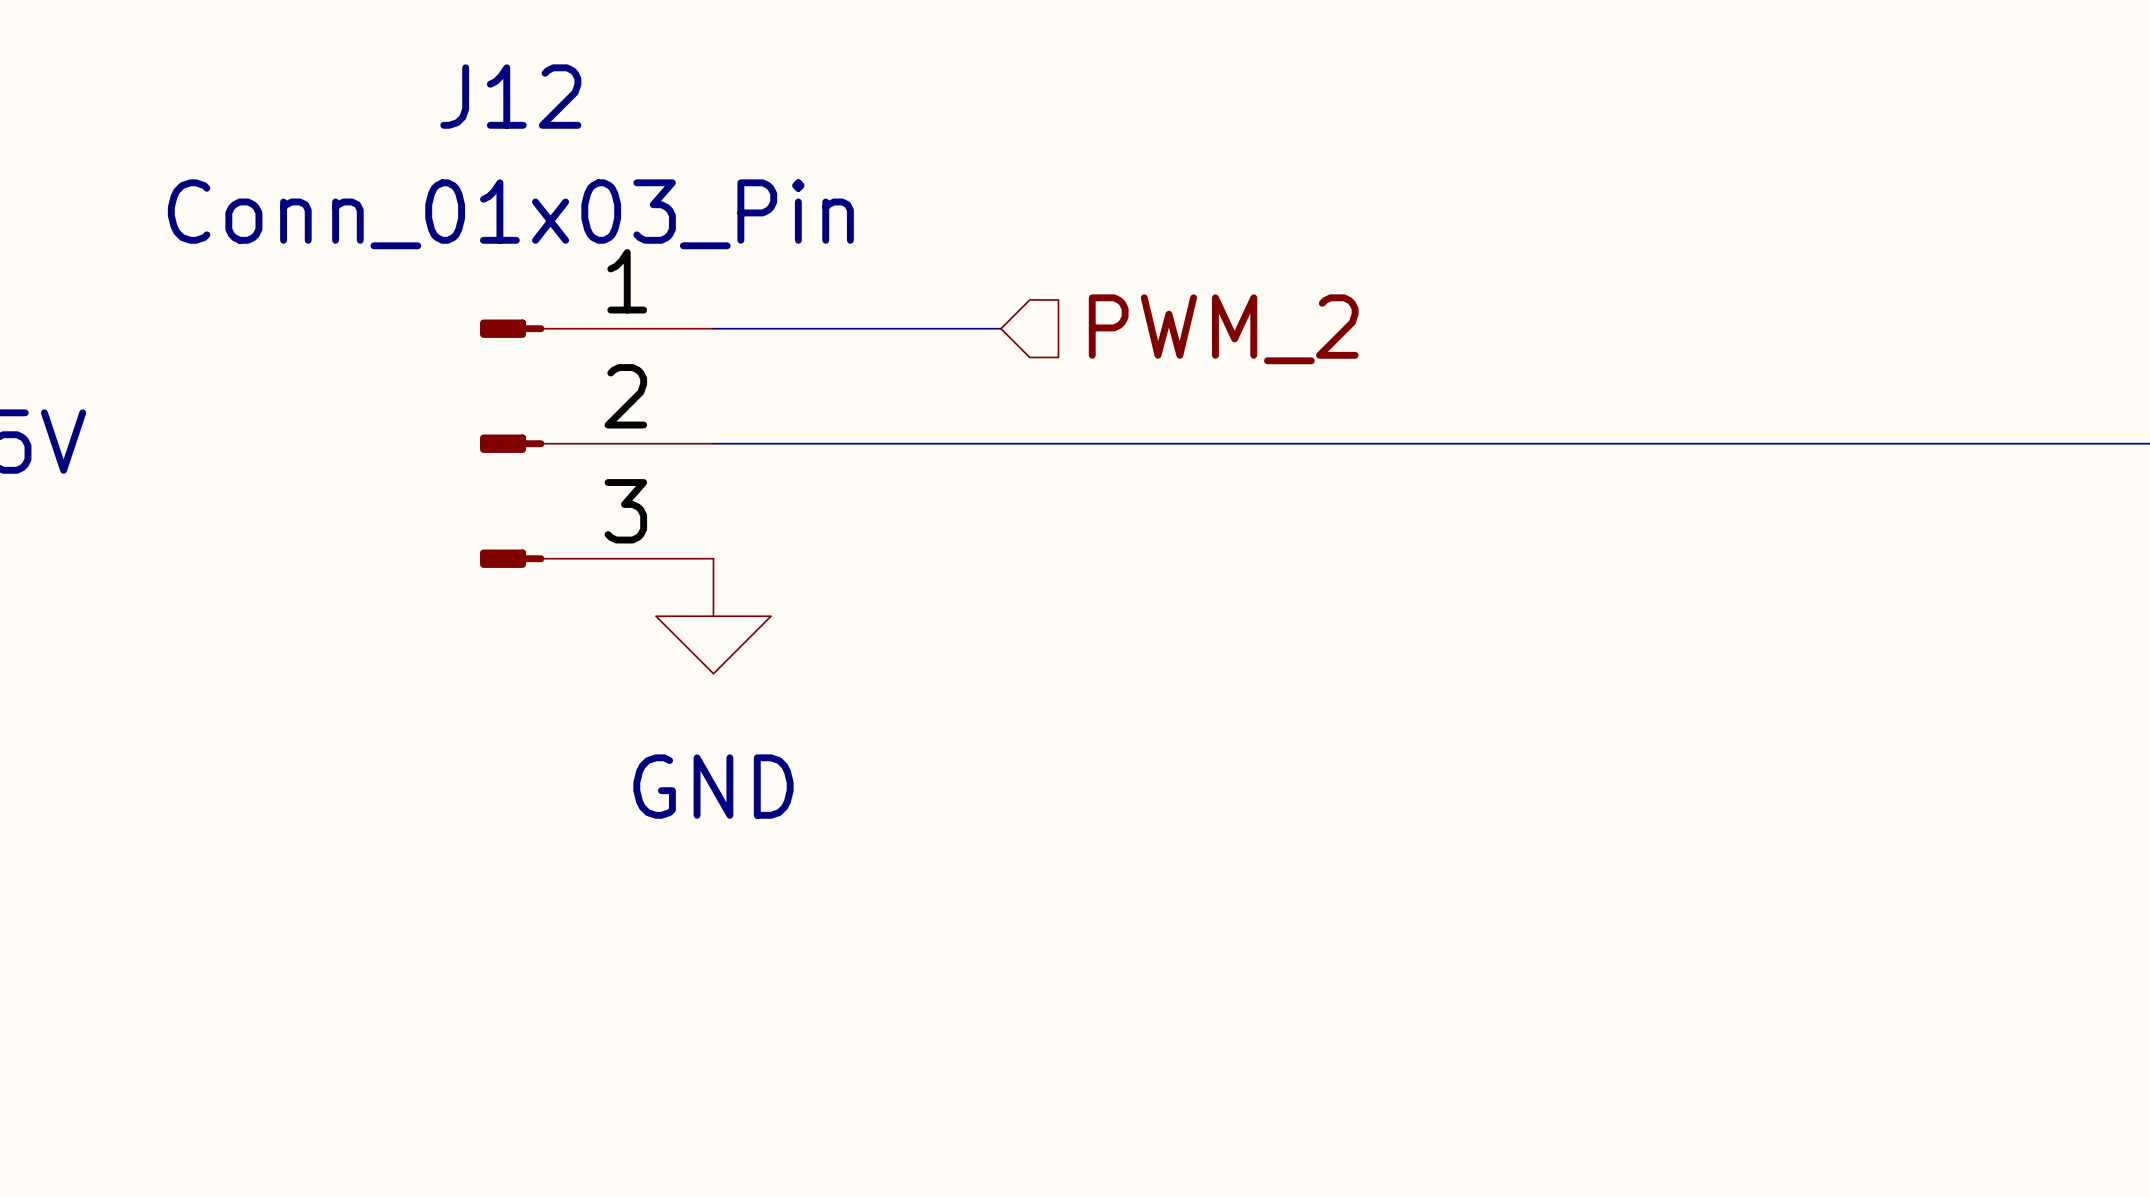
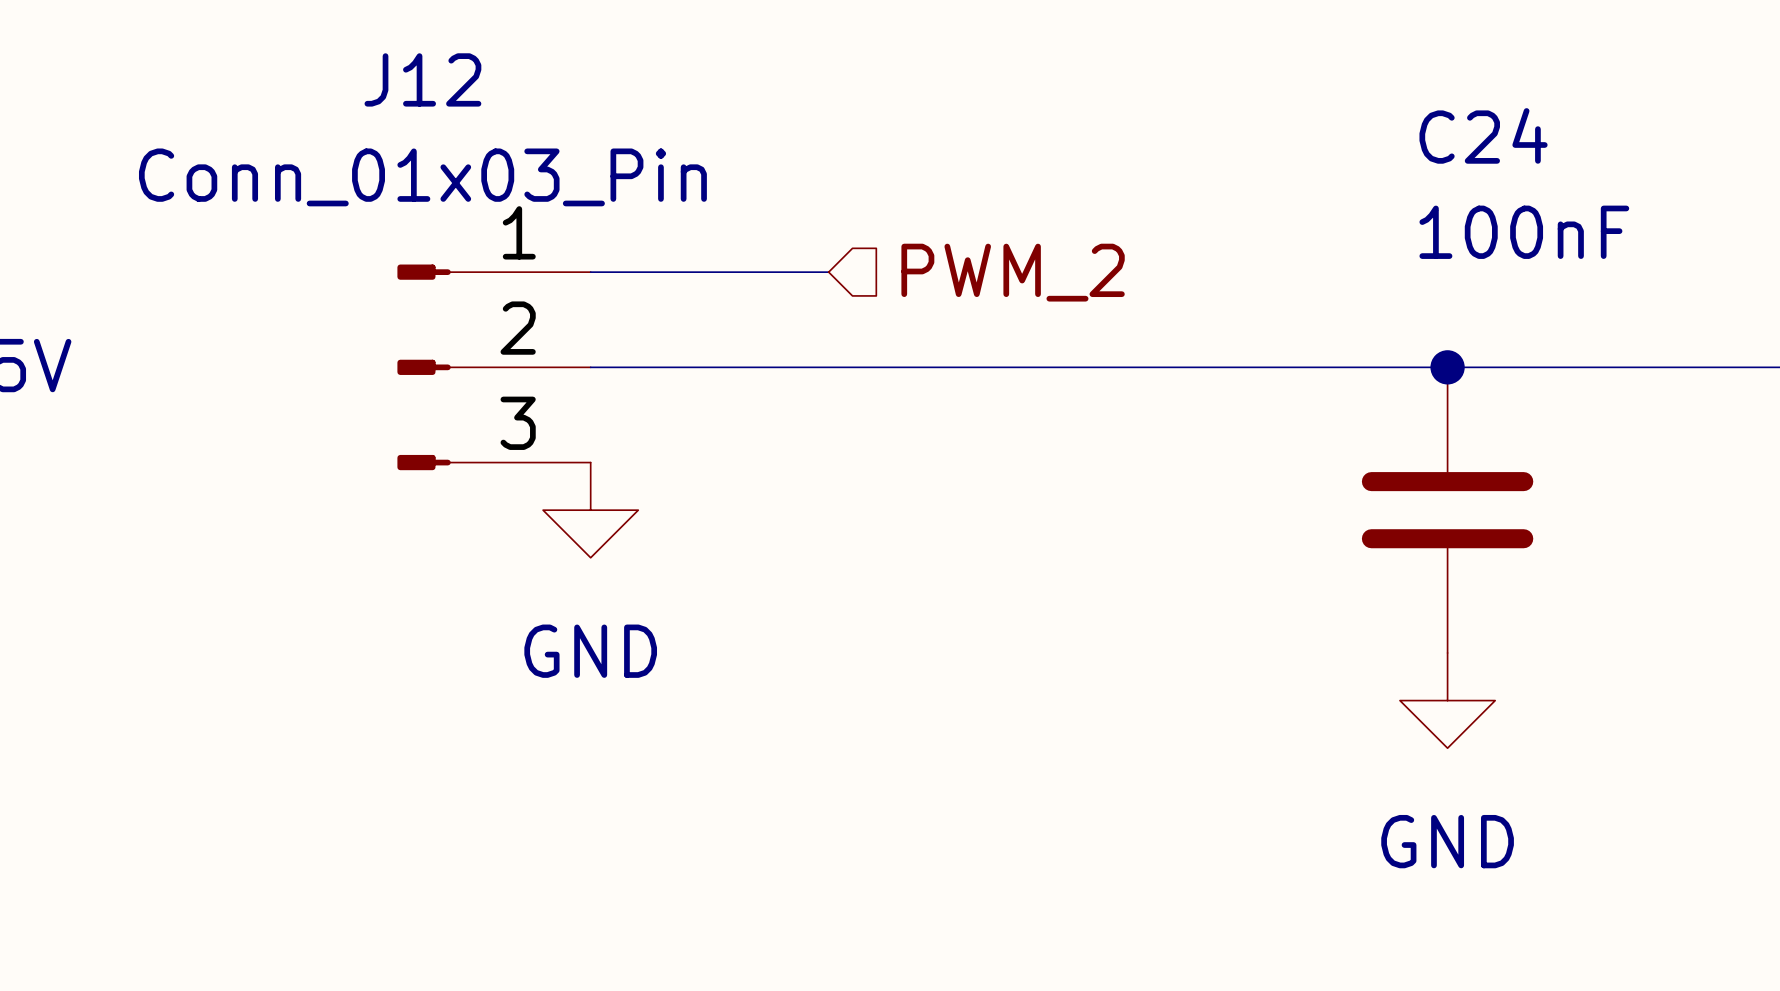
junction: none -> (1447, 367)
C24: none -> 100nF (1447, 510)
power symbol: none -> GND (1447, 700)

